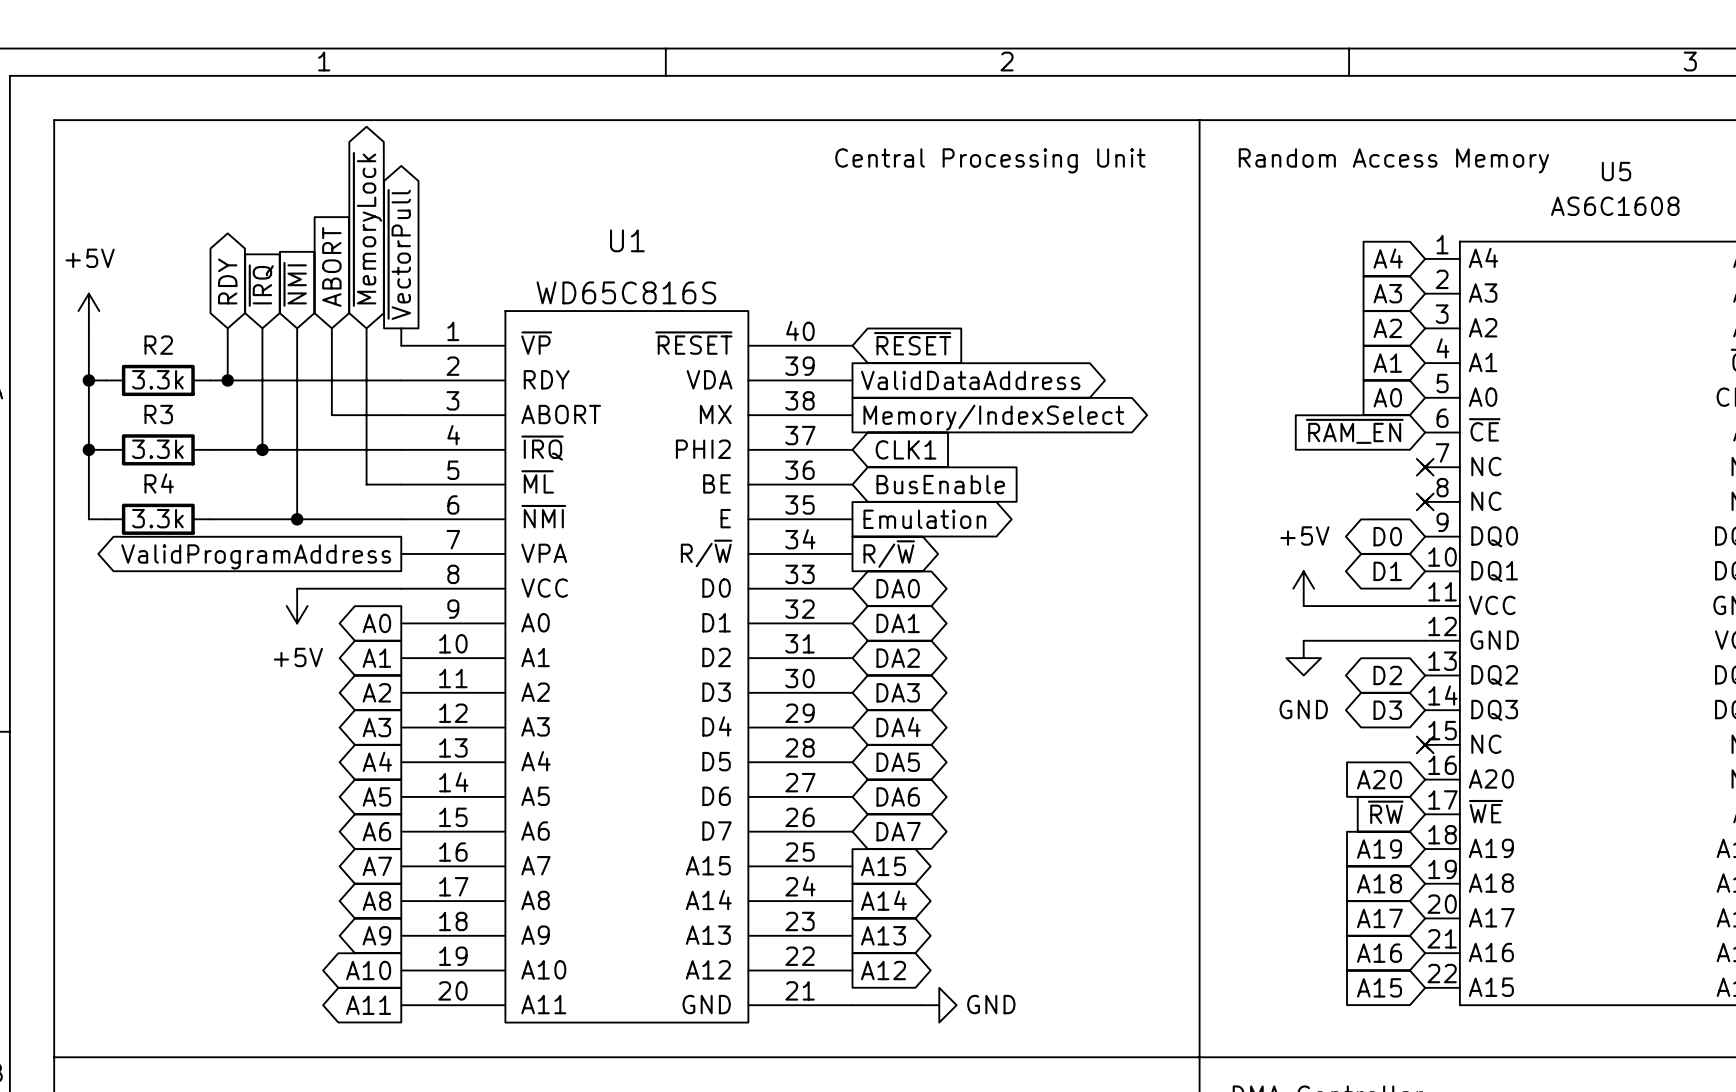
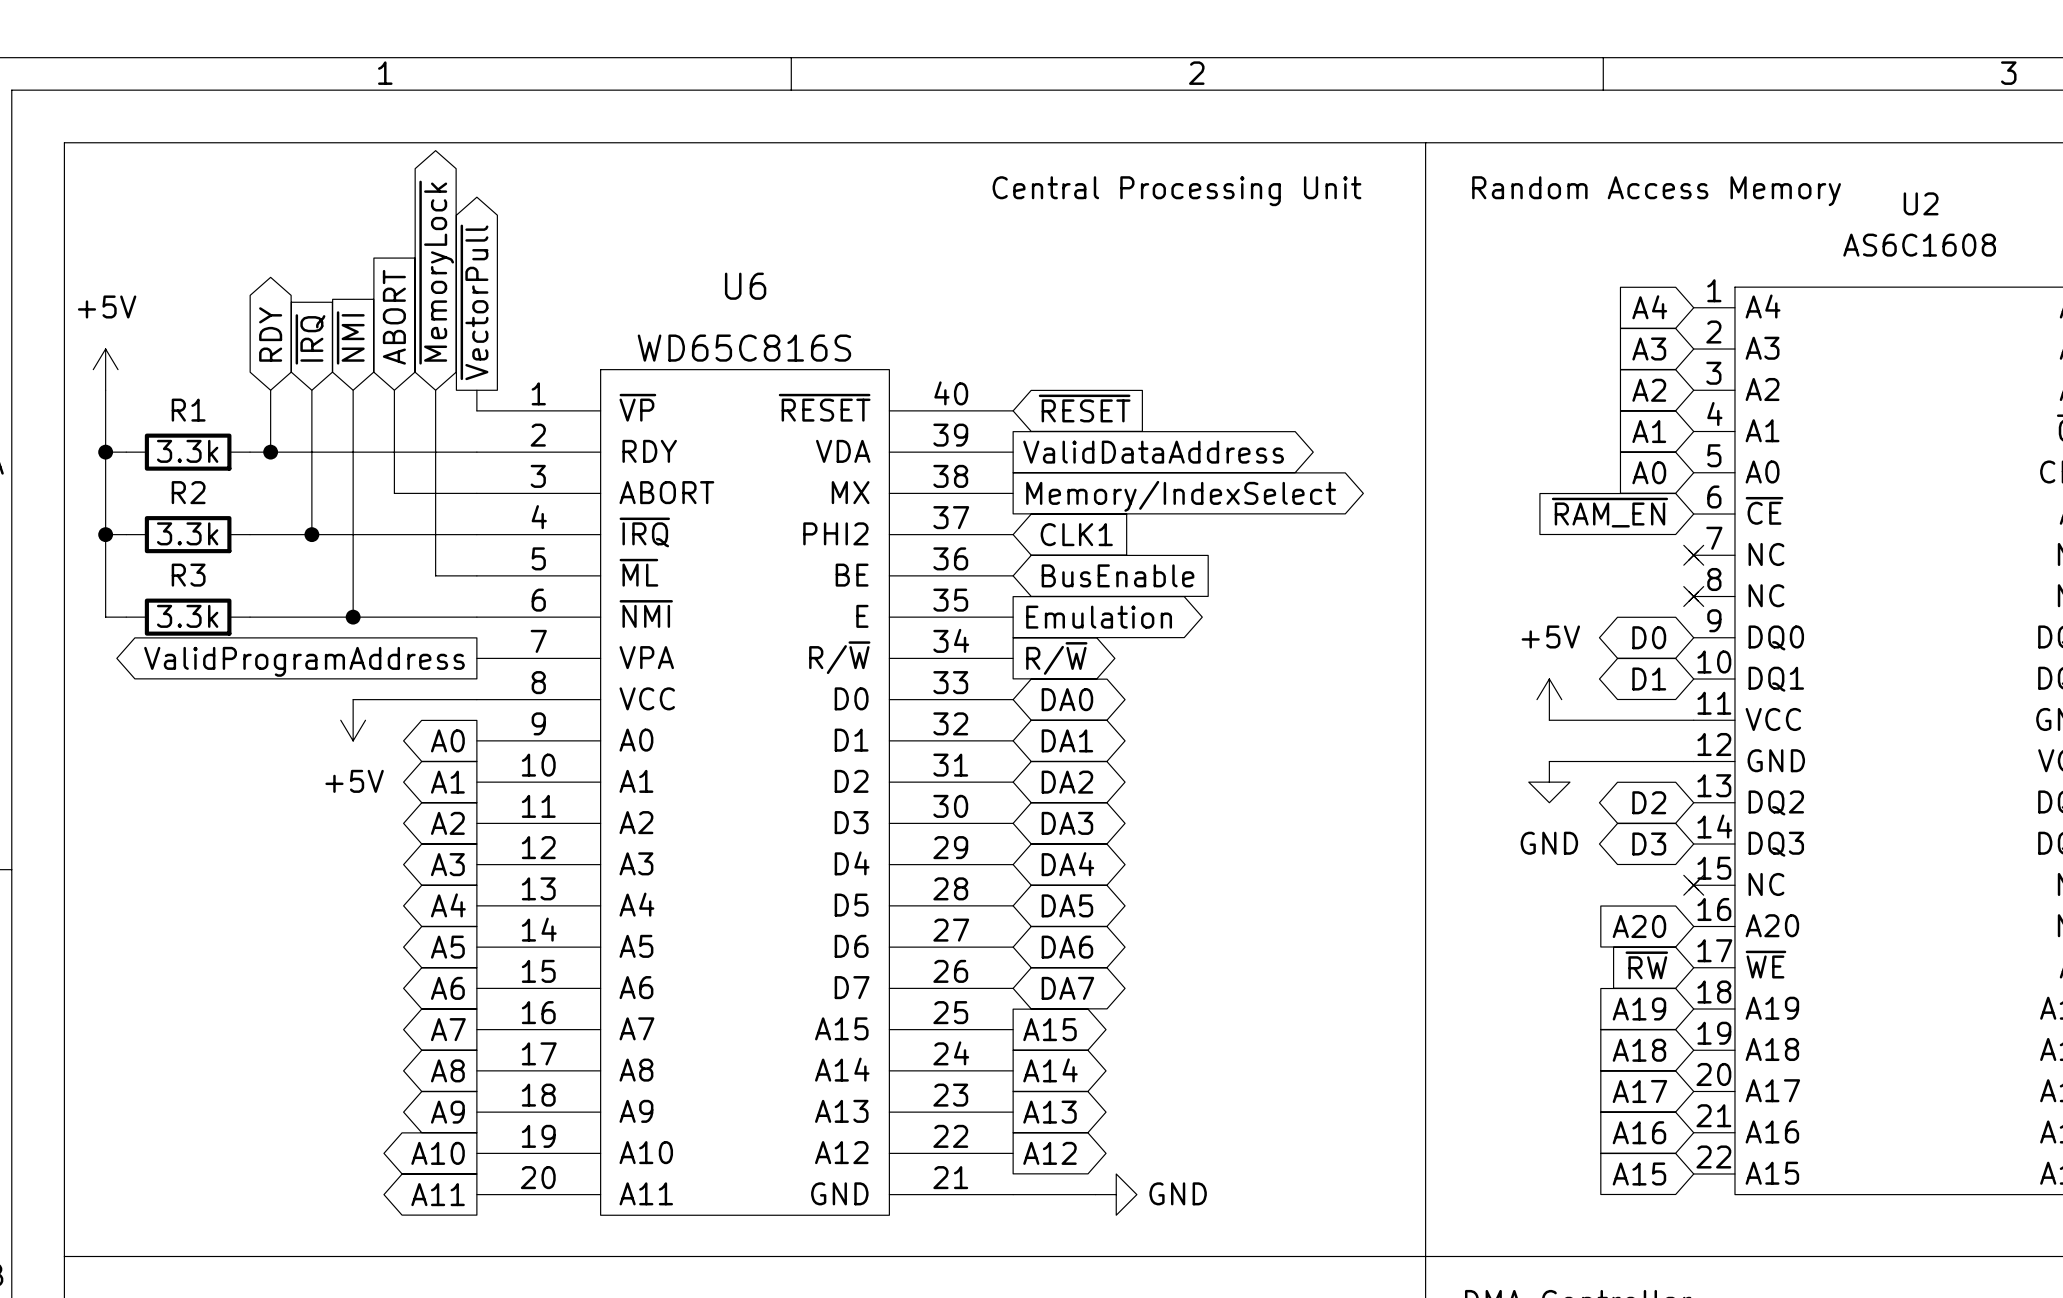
U5 name: U5 (1616, 171) -> U2 (1921, 203)
U1 name: U1 (627, 240) -> U6 (745, 286)
R2 name: R2 (158, 345) -> R1 (188, 410)
R3 name: R3 (158, 414) -> R2 (188, 492)
R4 name: R4 (159, 483) -> R3 (188, 575)

